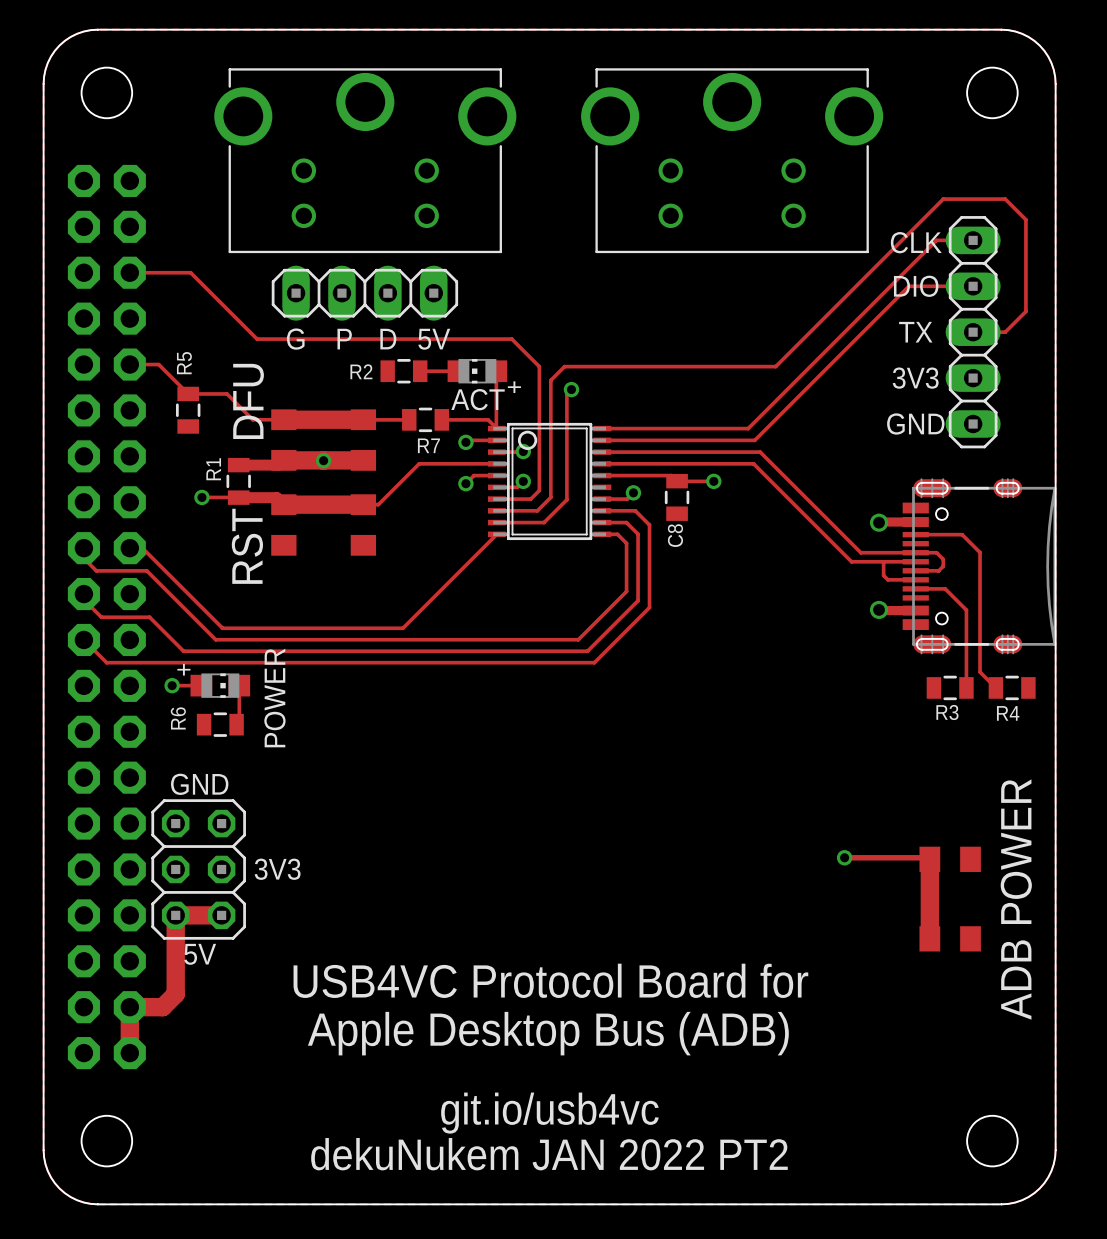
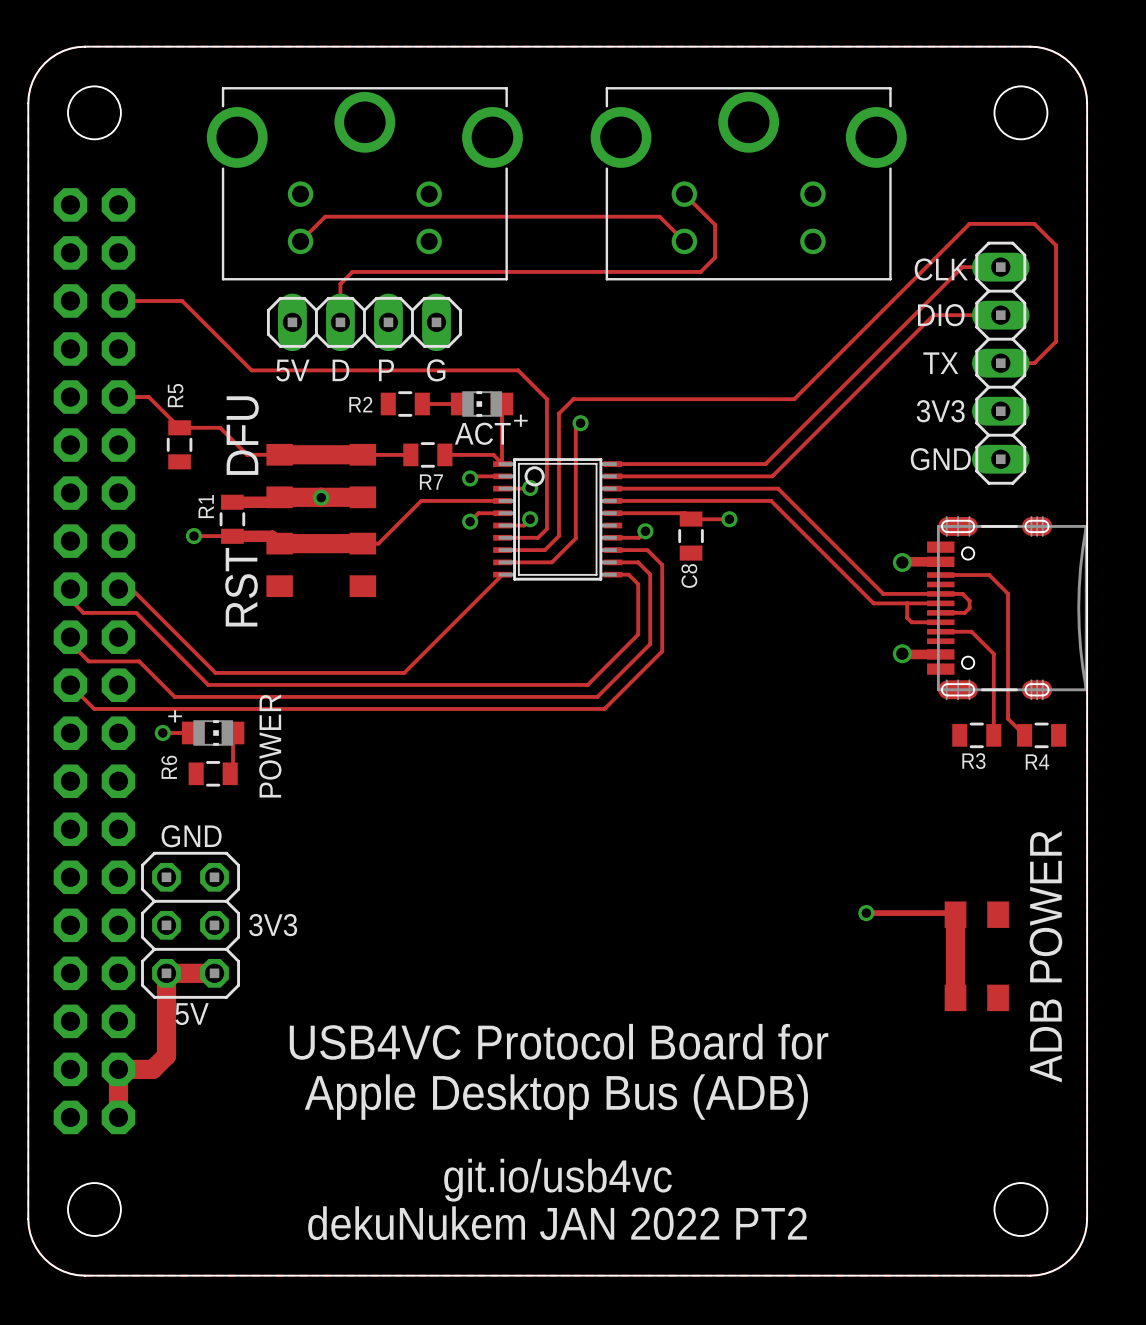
track: none -> (684, 194) (715, 224) (715, 257) (700, 271) (352, 271) (340, 283) (340, 322)
track: none -> (300, 241) (325, 216) (659, 216) (684, 241)
text: G (295, 339) -> 5V (292, 370)
text: P (344, 339) -> D (340, 370)
text: D (388, 339) -> P (386, 370)
text: 5V (434, 339) -> G (436, 370)

